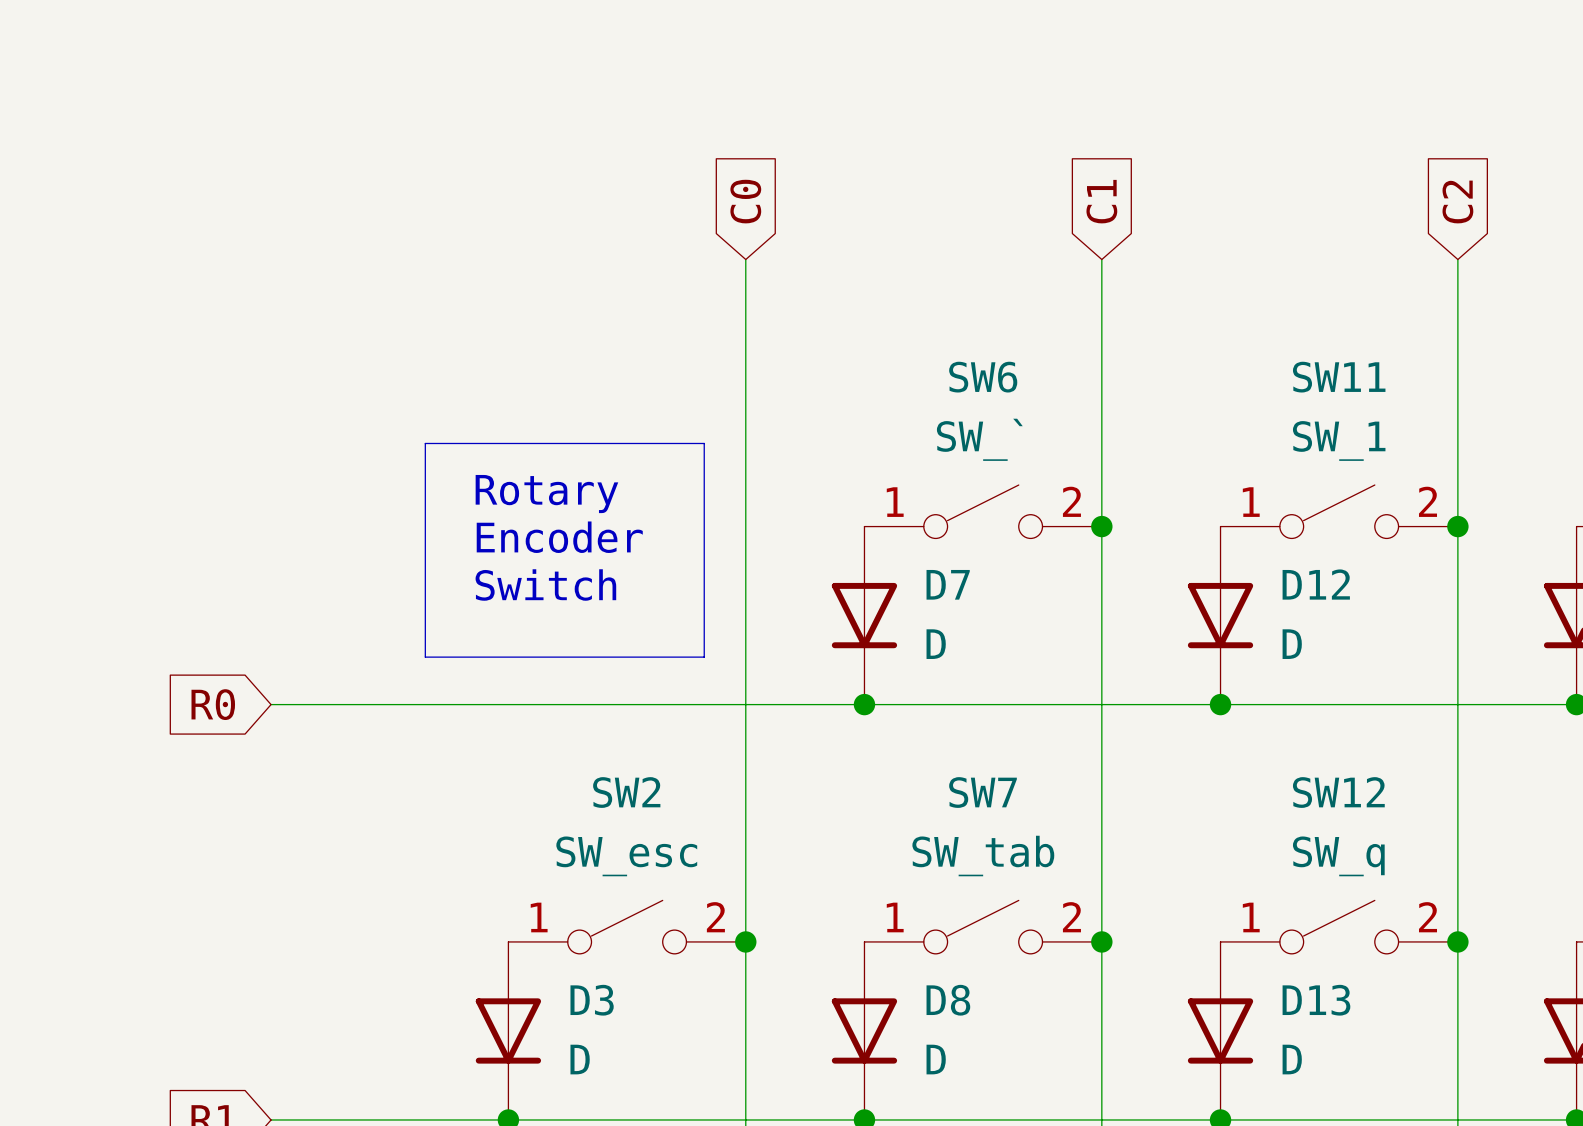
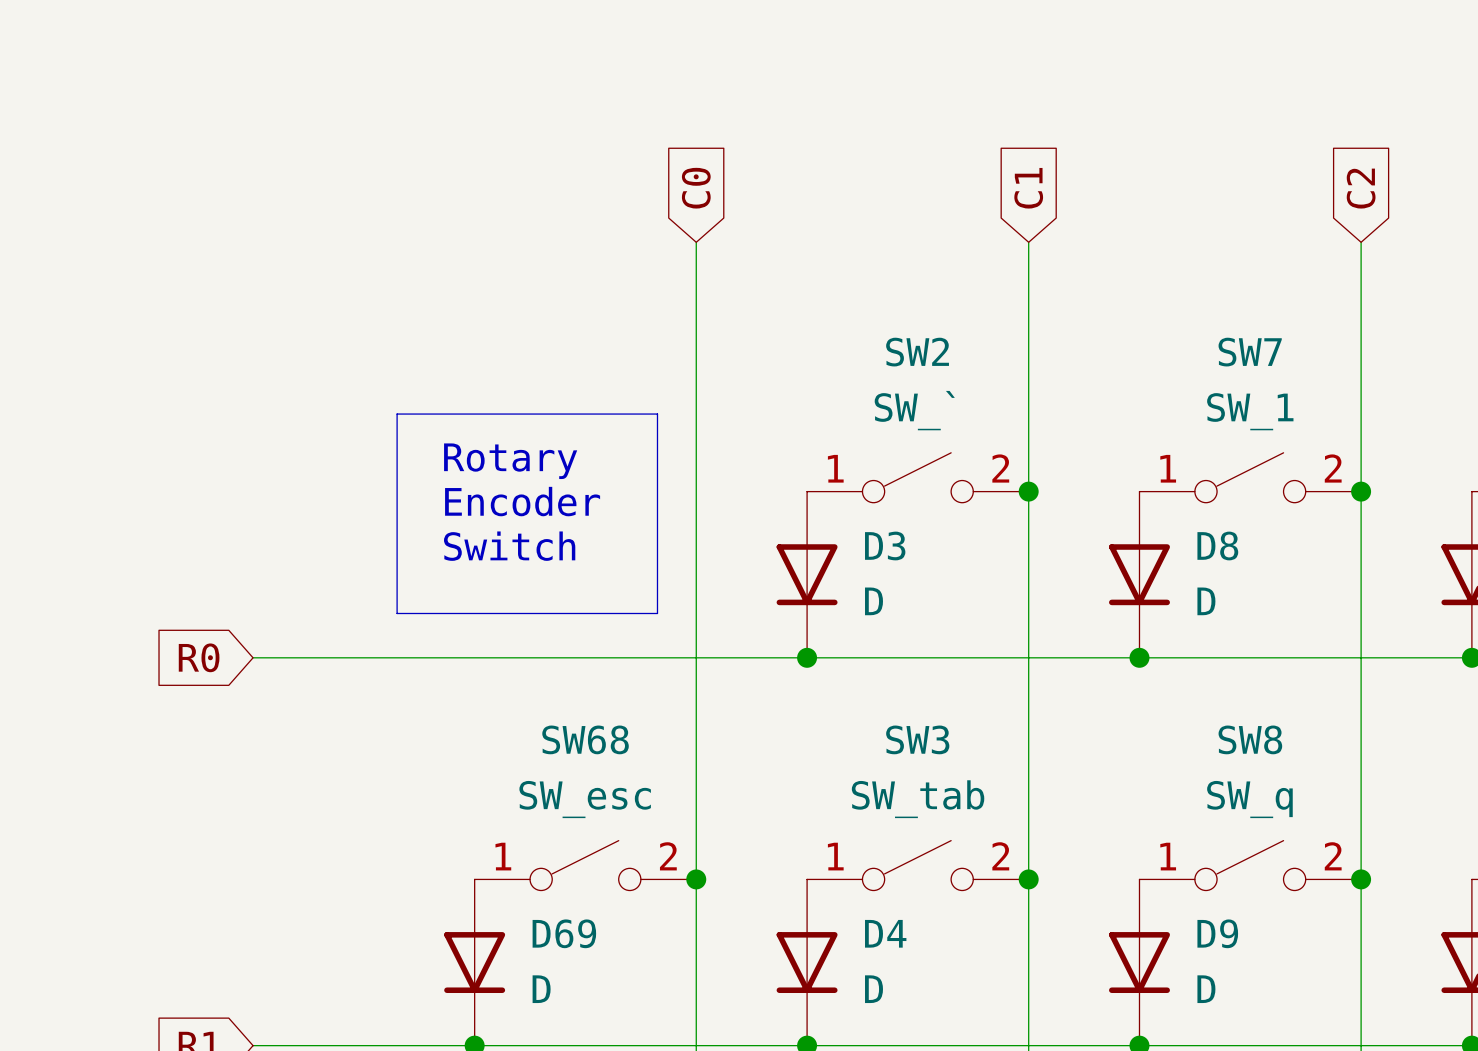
SW6 name: SW6 (983, 377) -> SW2 (917, 352)
SW11 name: SW11 (1339, 377) -> SW7 (1250, 352)
D7 name: D7 (948, 584) -> D3 (885, 545)
D12 name: D12 (1316, 584) -> D8 (1217, 545)
SW2 name: SW2 (626, 792) -> SW68 (585, 739)
SW7 name: SW7 (983, 792) -> SW3 (917, 739)
SW12 name: SW12 (1338, 792) -> SW8 (1250, 739)
D3 name: D3 (592, 1000) -> D69 (564, 933)
D8 name: D8 (948, 1000) -> D4 (885, 933)
D13 name: D13 (1316, 1000) -> D9 (1217, 933)

